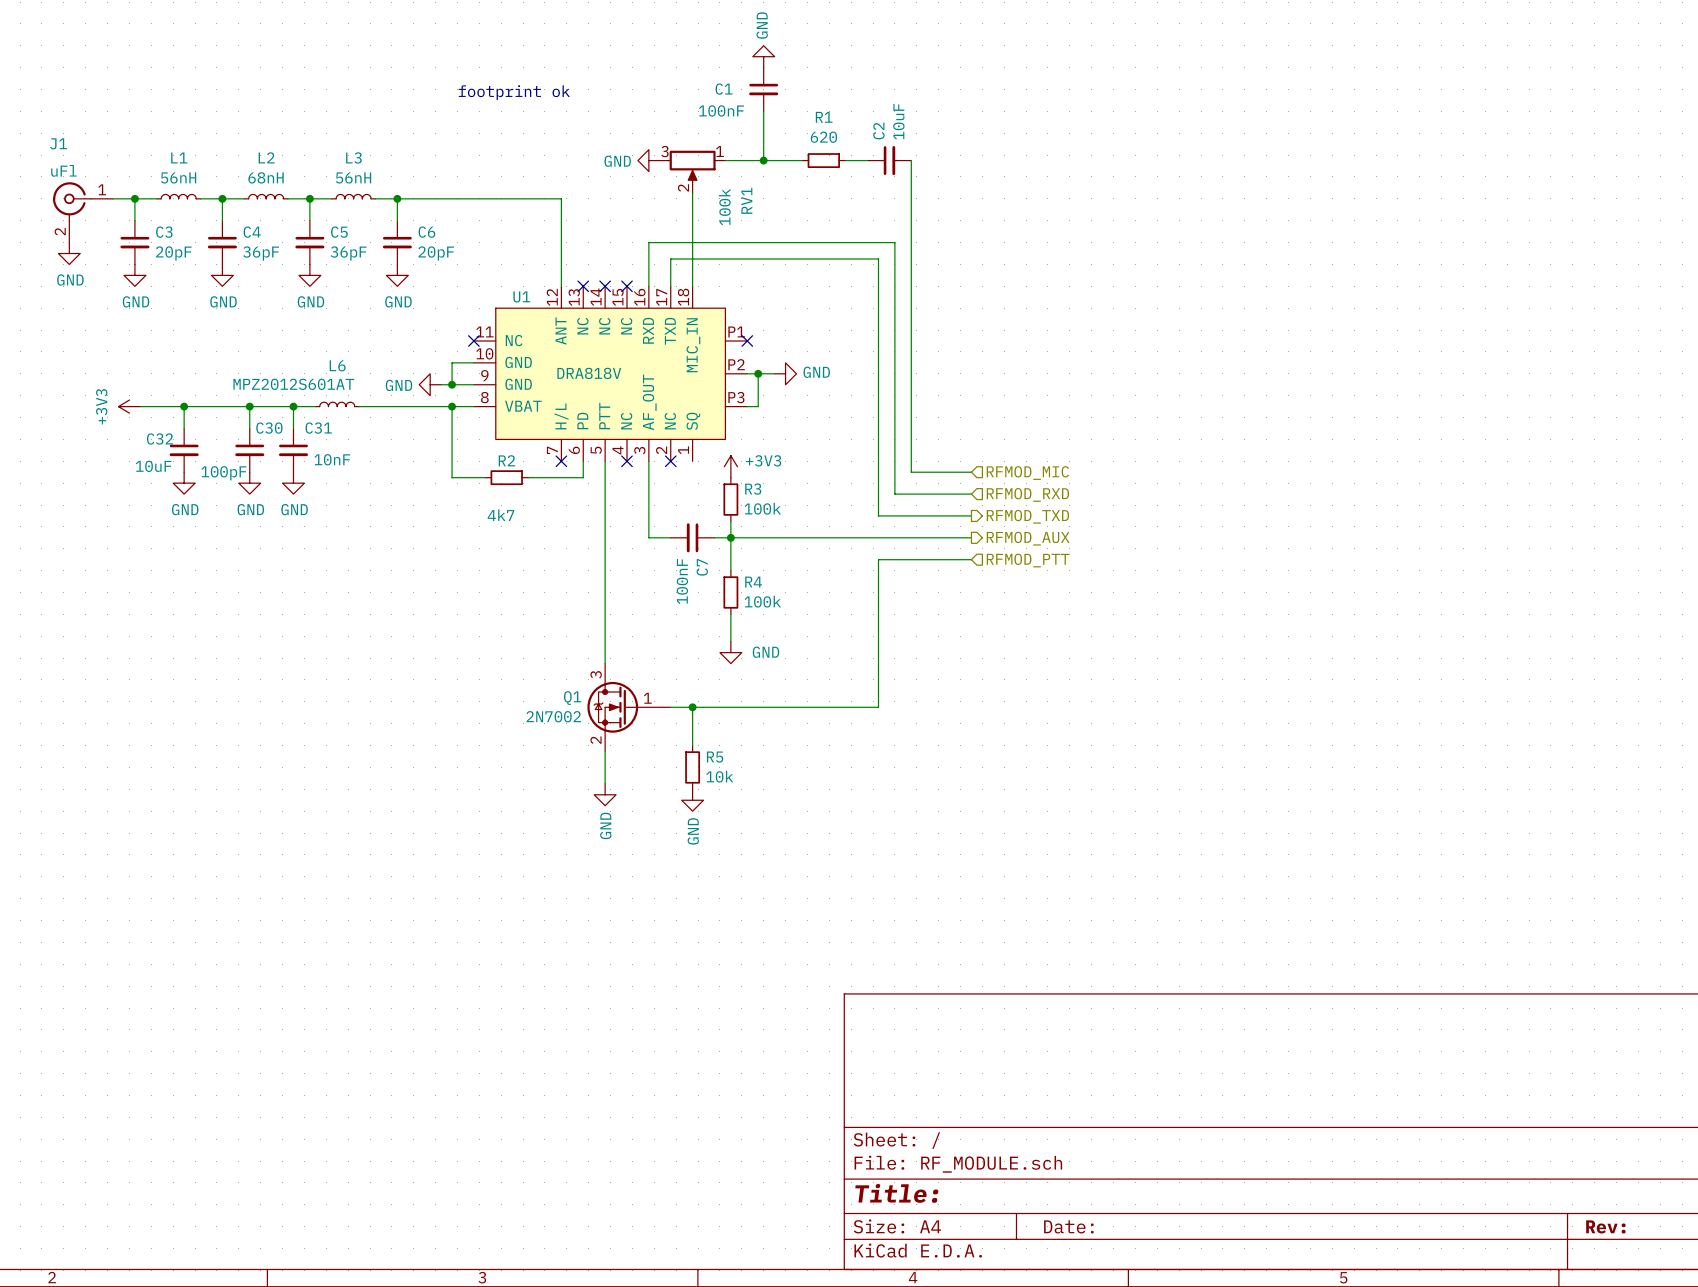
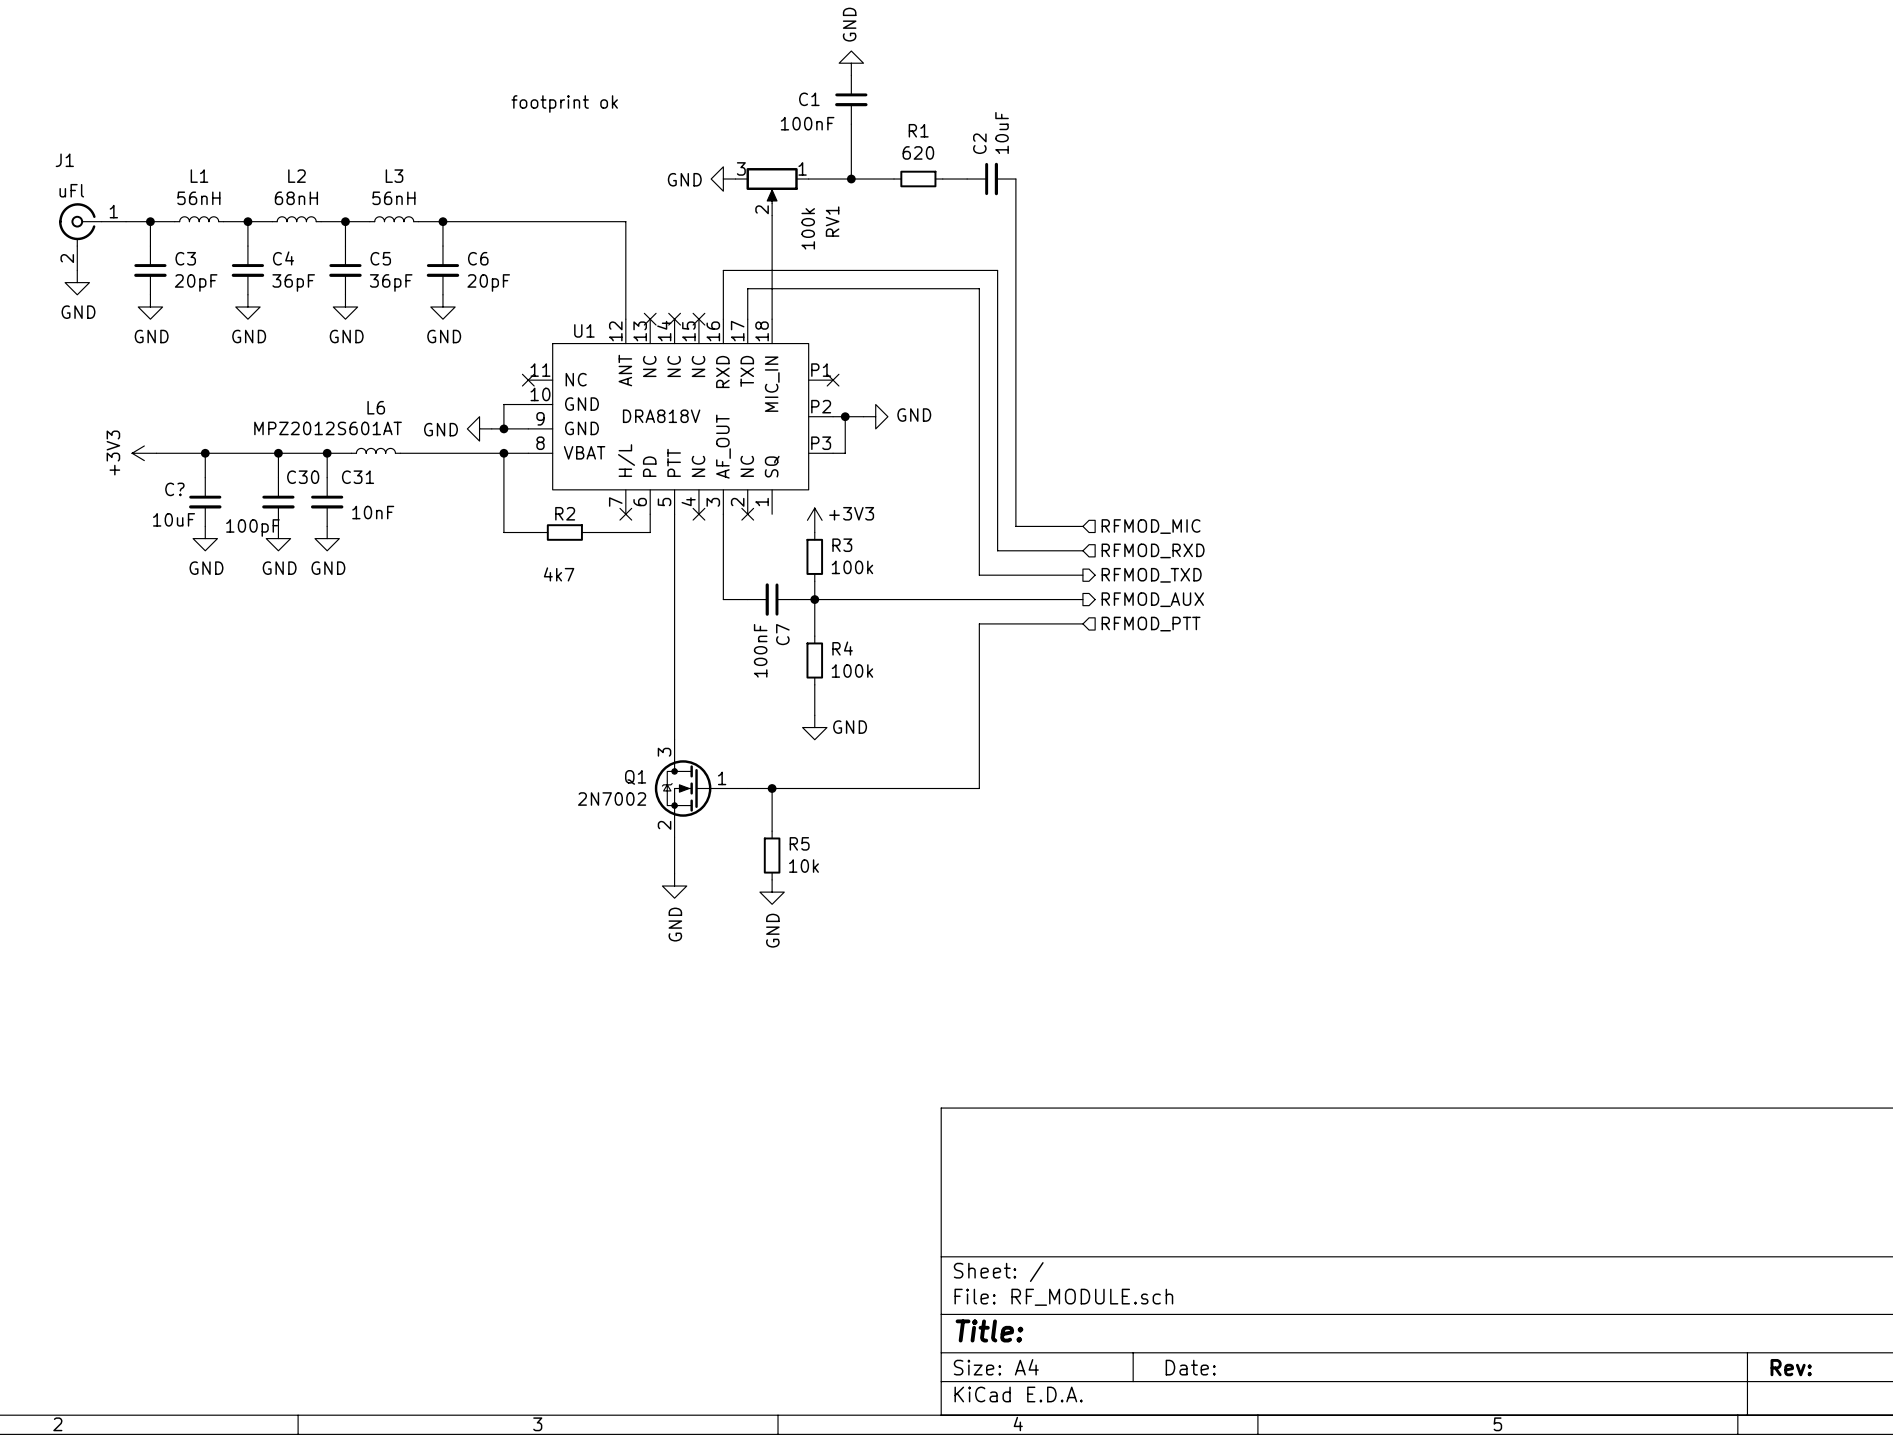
C32 name: C32 (160, 439) -> C? (174, 489)

